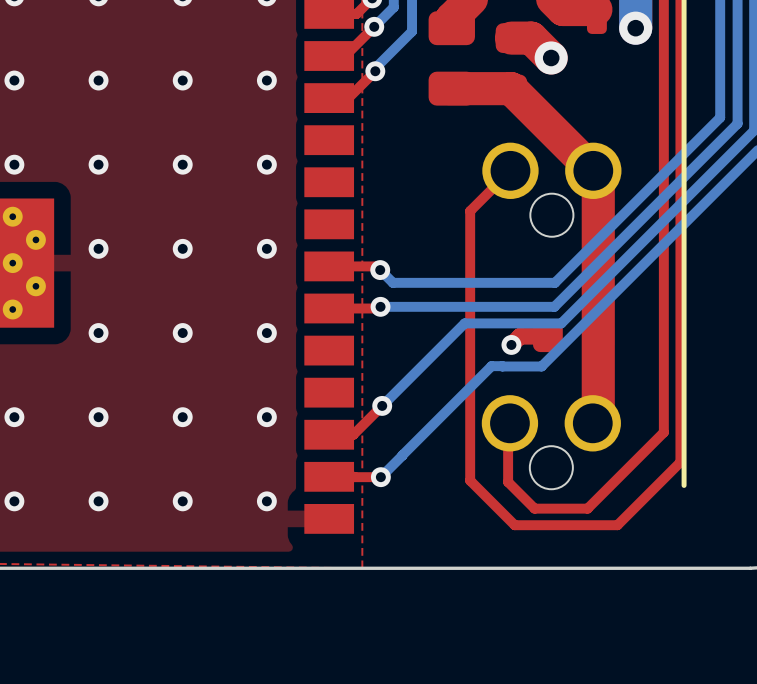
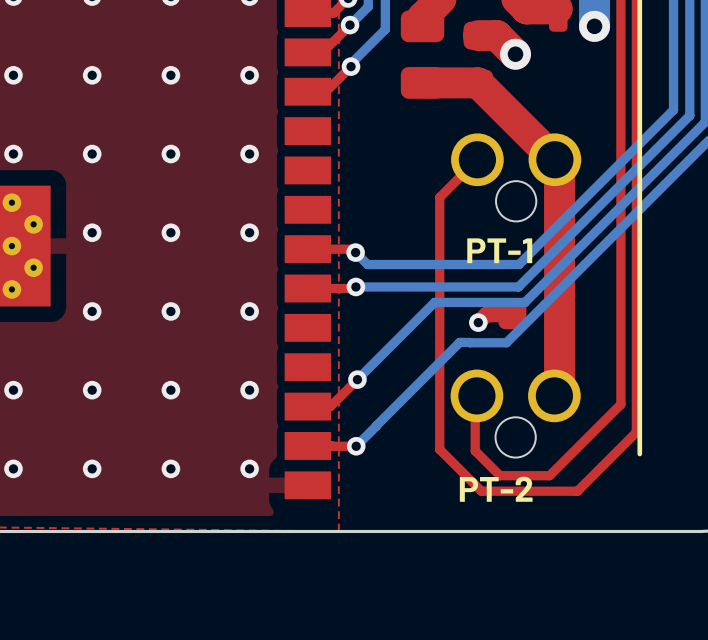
text: none -> PT-1 (499, 250)
text: none -> PT-2 (496, 489)

